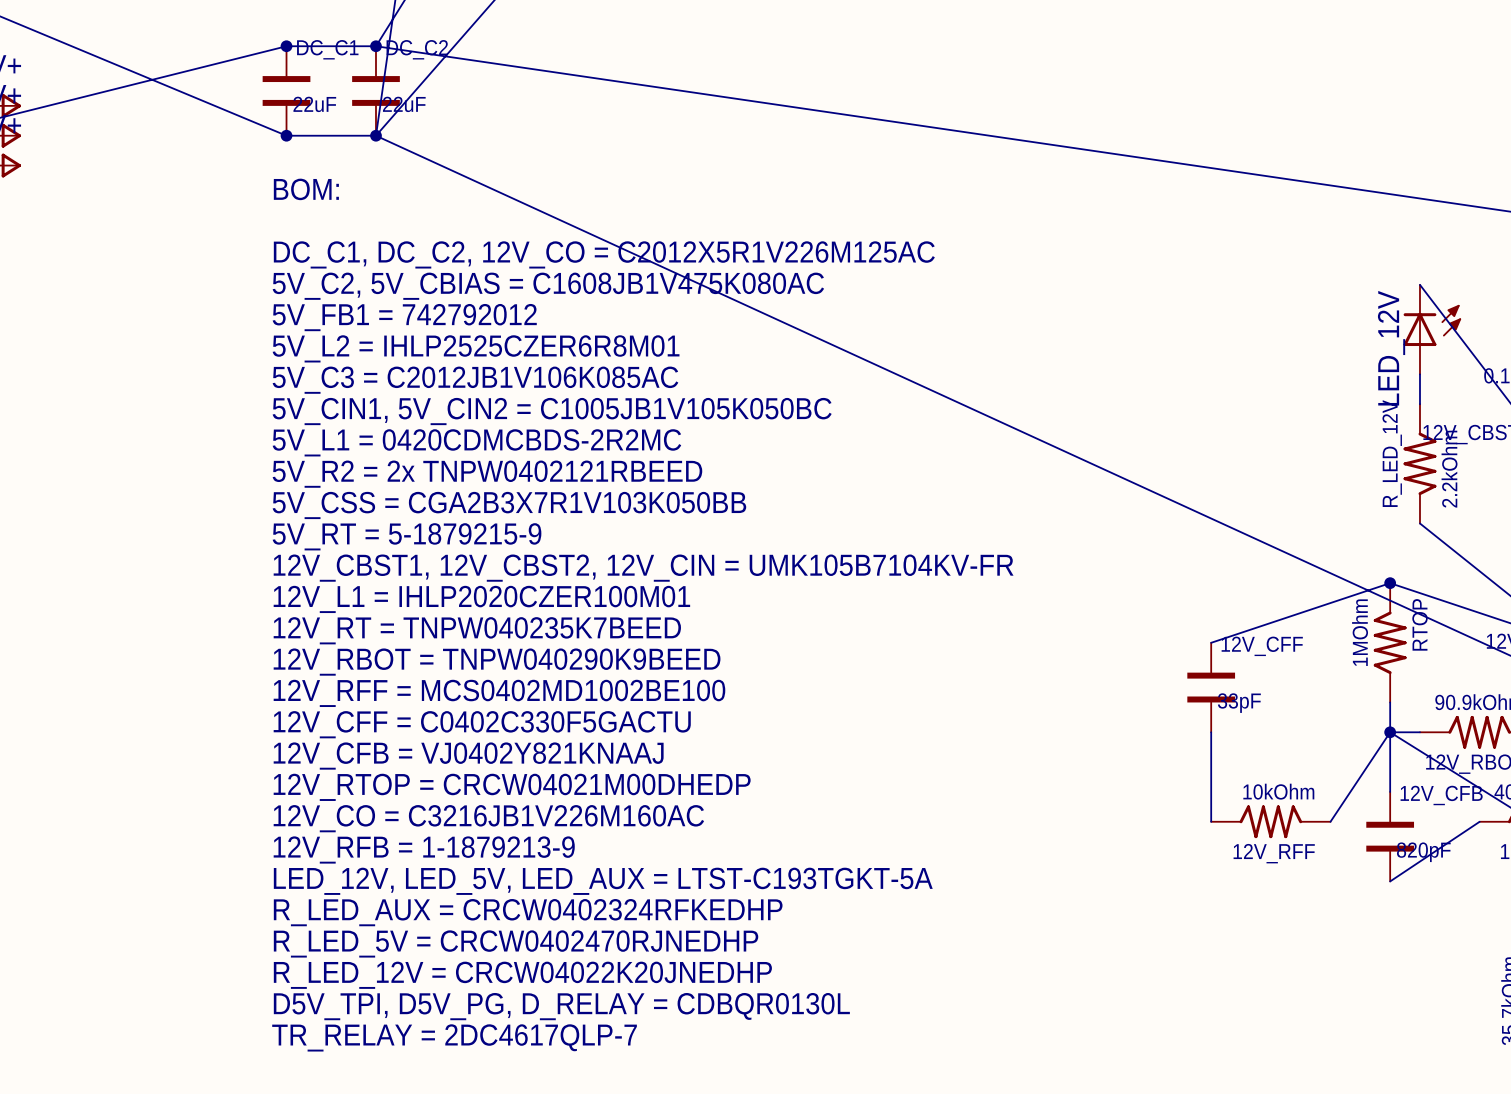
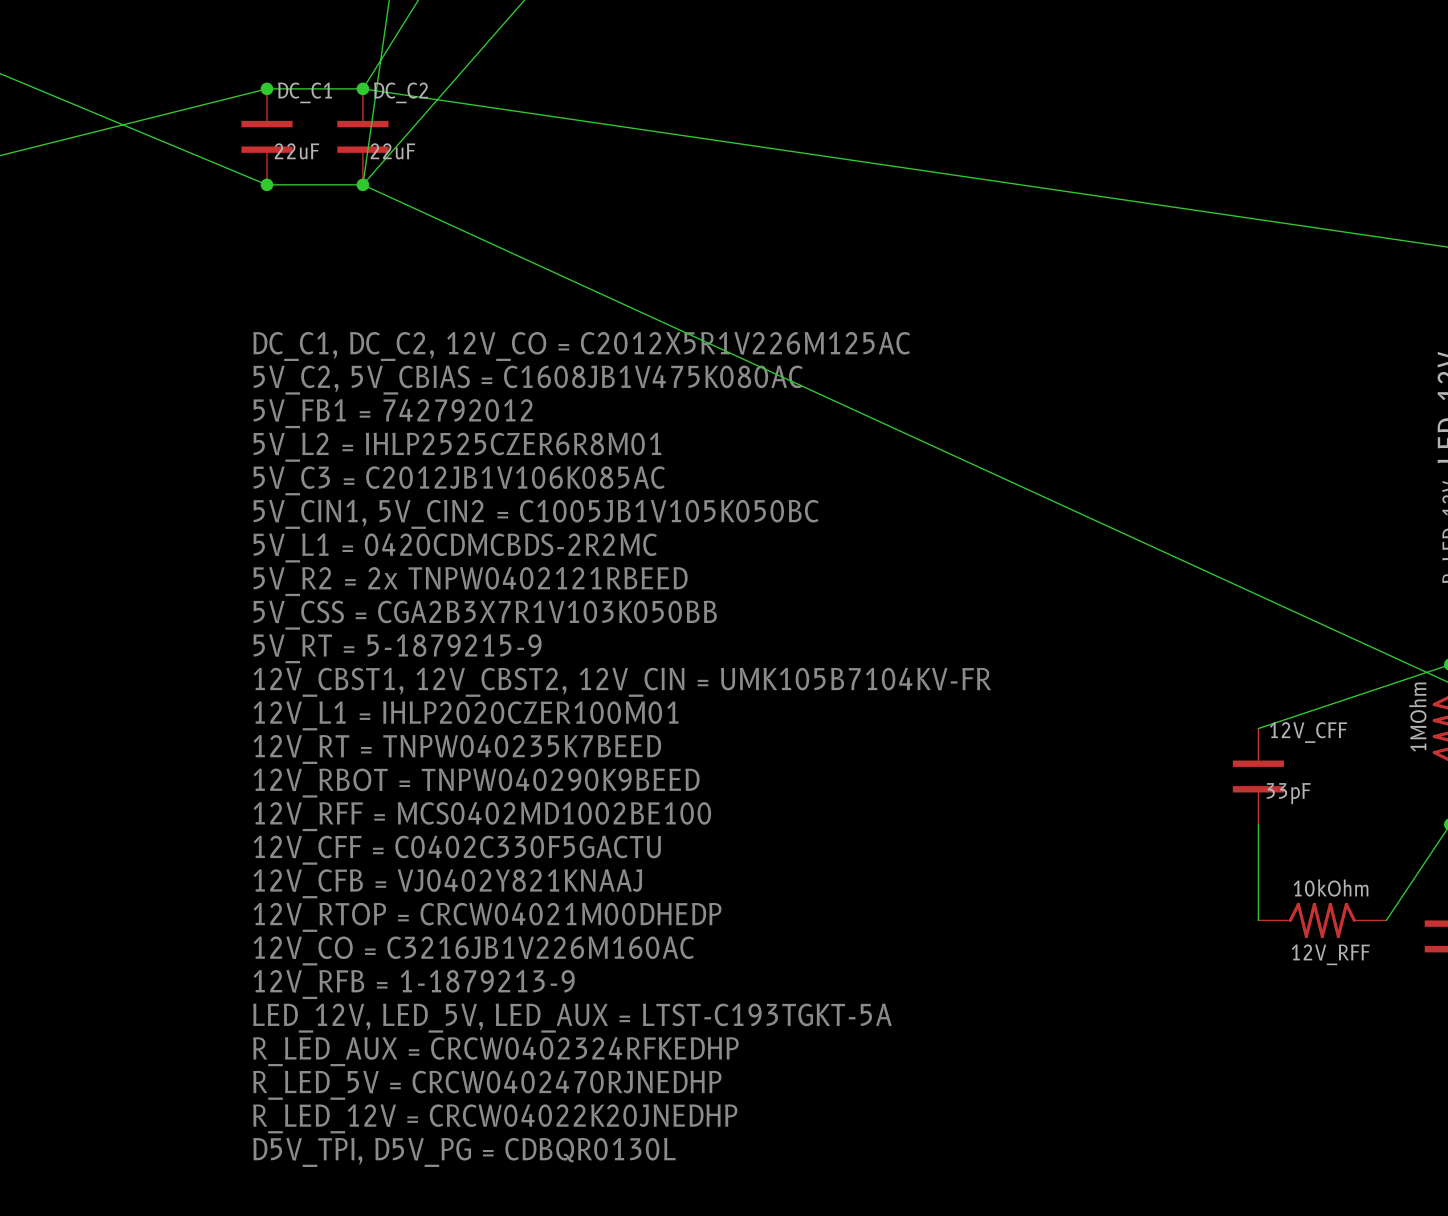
text: BOM: (306, 189) -> none
text: DC_C1, DC_C2, 12V_CO = C2012X5R1V226M125AC (604, 254) -> none
text: 5V_C2, 5V_CBIAS = C1608JB1V475K080AC (548, 286) -> DC_C1, DC_C2, 12V_CO = C2012X5R1V226M125AC (581, 346)
text: 5V_FB1 = 742792012 (404, 317) -> 5V_C2, 5V_CBIAS = C1608JB1V475K080AC (528, 380)
text: 5V_L2 = IHLP2525CZER6R8M01 (476, 348) -> 5V_FB1 = 742792012 (393, 413)
text: 5V_C3 = C2012JB1V106K085AC (475, 380) -> 5V_L2 = IHLP2525CZER6R8M01 (457, 447)
text: 5V_CIN1, 5V_CIN2 = C1005JB1V105K050BC (552, 411) -> 5V_C3 = C2012JB1V106K085AC (459, 480)
text: 5V_L1 = 0420CDMCBDS-2R2MC (476, 442) -> 5V_CIN1, 5V_CIN2 = C1005JB1V105K050BC (536, 514)
text: 5V_R2 = 2x TNPW0402121RBEED (487, 474) -> 5V_L1 = 0420CDMCBDS-2R2MC (455, 547)
text: 5V_CSS = CGA2B3X7R1V103K050BB (509, 505) -> 5V_R2 = 2x TNPW0402121RBEED (470, 581)
text: 5V_RT = 5-1879215-9 (407, 536) -> 5V_CSS = CGA2B3X7R1V103K050BB (485, 615)
text: 12V_CBST1, 12V_CBST2, 12V_CIN = UMK105B7104KV-FR (643, 568) -> 5V_RT = 5-1879215-9 (397, 648)
text: 12V_L1 = IHLP2020CZER100M01 (481, 599) -> 12V_CBST1, 12V_CBST2, 12V_CIN = UMK105B7104KV-FR (622, 682)
text: 12V_RT = TNPW040235K7BEED (477, 630) -> 12V_L1 = IHLP2020CZER100M01 (466, 715)
text: 12V_RBOT = TNPW040290K9BEED (497, 662) -> 12V_RT = TNPW040235K7BEED (457, 749)
text: 12V_RFF = MCS0402MD1002BE100 (499, 693) -> 12V_RBOT = TNPW040290K9BEED (476, 783)
text: 12V_CFF = C0402C330F5GACTU (482, 724) -> 12V_RFF = MCS0402MD1002BE100 (482, 816)
text: 12V_CFB = VJ0402Y821KNAAJ (468, 756) -> 12V_CFF = C0402C330F5GACTU (457, 850)
text: 12V_RTOP = CRCW04021M00DHEDP (512, 787) -> 12V_CFB = VJ0402Y821KNAAJ (447, 883)
text: 12V_CO = C3216JB1V226M160AC (488, 818) -> 12V_RTOP = CRCW04021M00DHEDP (487, 917)
text: 12V_RFB = 1-1879213-9 (424, 849) -> 12V_CO = C3216JB1V226M160AC (473, 950)
text: LED_12V, LED_5V, LED_AUX = LTST-C193TGKT-5A (603, 881) -> 12V_RFB = 1-1879213-9 (414, 984)
text: R_LED_AUX = CRCW0402324RFKEDHP (528, 912) -> LED_12V, LED_5V, LED_AUX = LTST-C193TGKT-5A (572, 1018)
text: R_LED_5V = CRCW0402470RJNEDHP (516, 943) -> R_LED_AUX = CRCW0402324RFKEDHP (495, 1051)
text: R_LED_12V = CRCW04022K20JNEDHP (522, 975) -> R_LED_5V = CRCW0402470RJNEDHP (487, 1085)
text: D5V_TPI, D5V_PG, D_RELAY = CDBQR0130L (561, 1006) -> R_LED_12V = CRCW04022K20JNEDHP (495, 1118)
text: TR_RELAY = 2DC4617QLP-7 (454, 1037) -> D5V_TPI, D5V_PG = CDBQR0130L (464, 1152)

